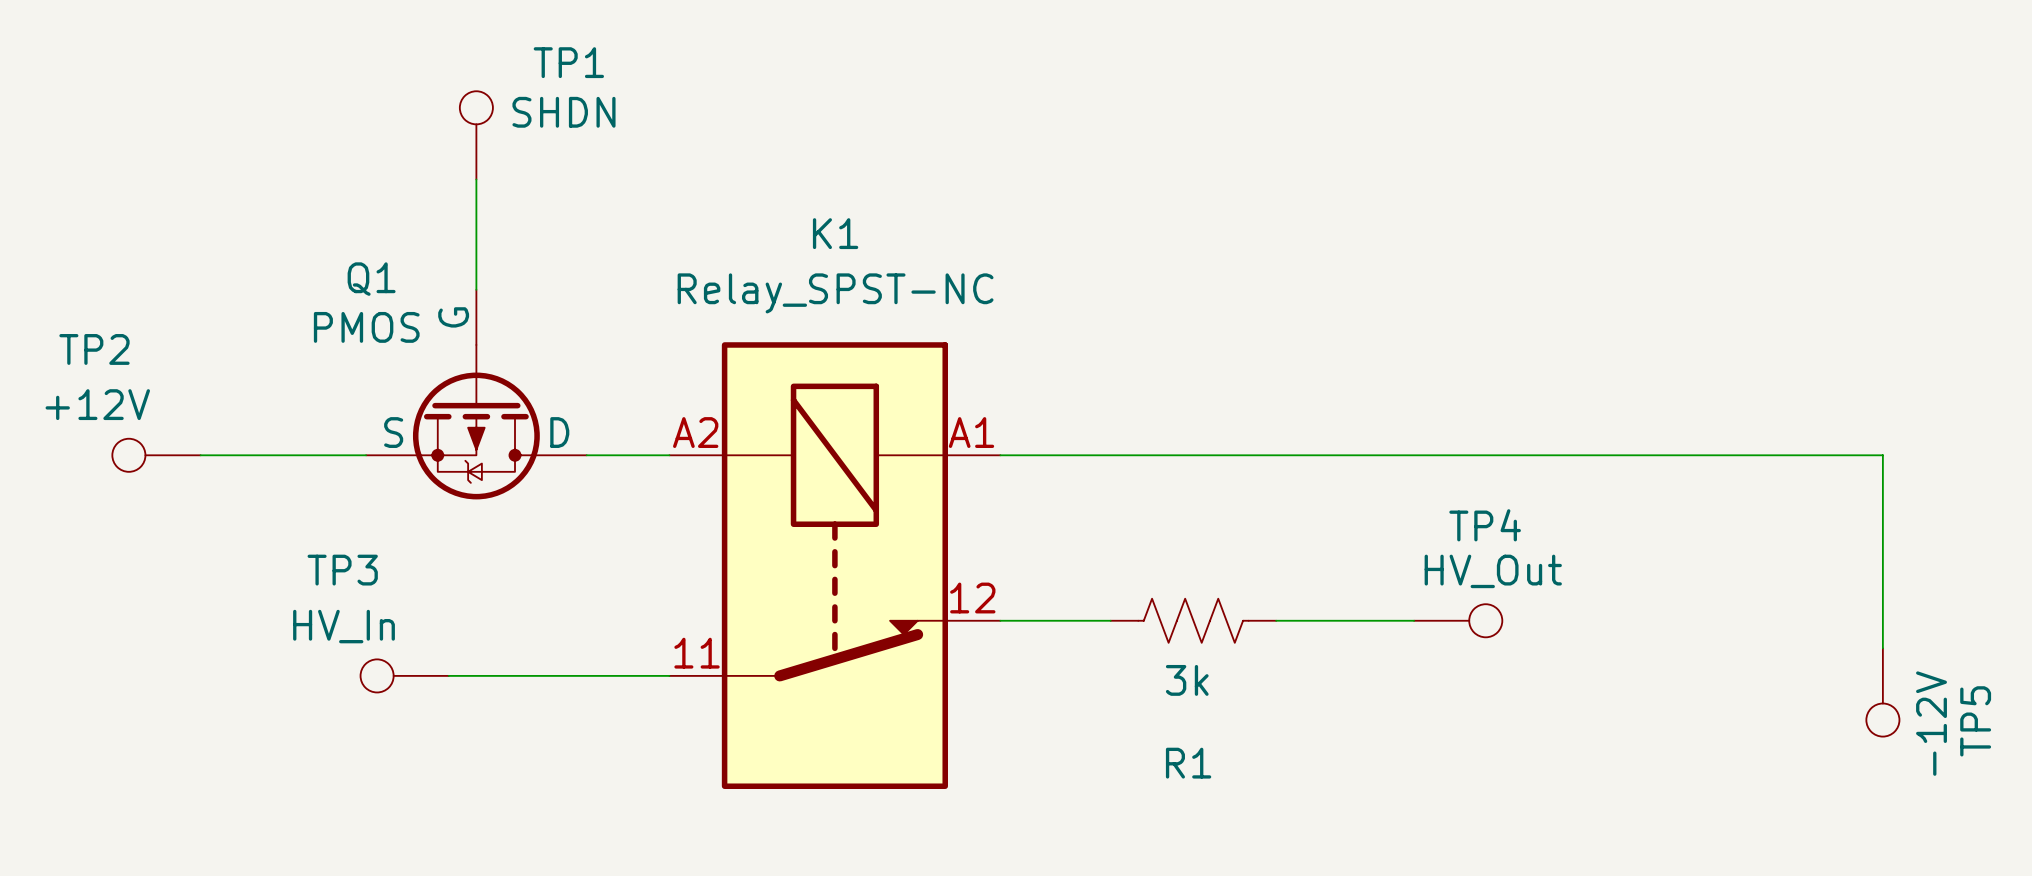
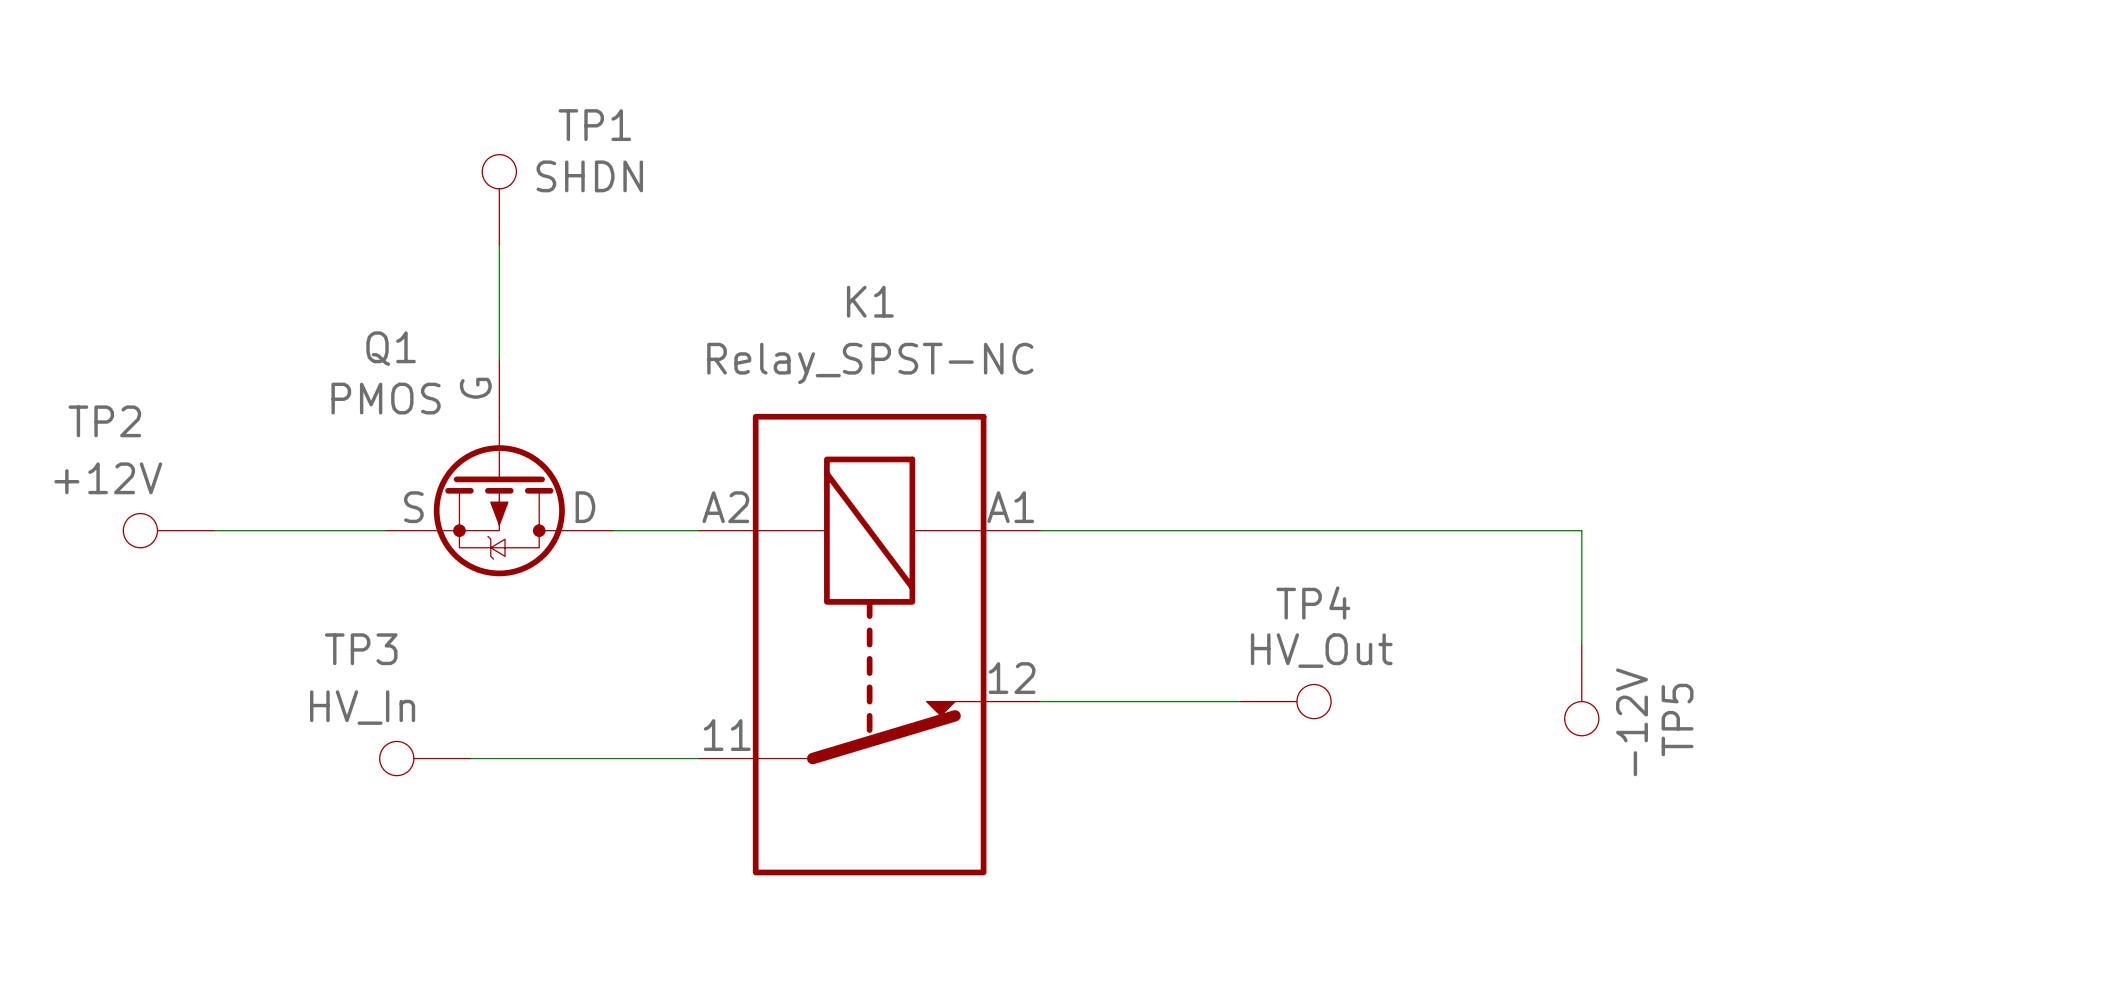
wire: (1524, 455) (1882, 455) (1882, 648) -> (1581, 530) (1581, 644)
wire: none -> (1154, 701) (1239, 701)
R1: 3k (1193, 620) -> none
wire: (1276, 620) (1414, 620) -> none
TP4 position: (1458, 620) -> (1285, 701)
TP5 position: (1882, 692) -> (1581, 690)

